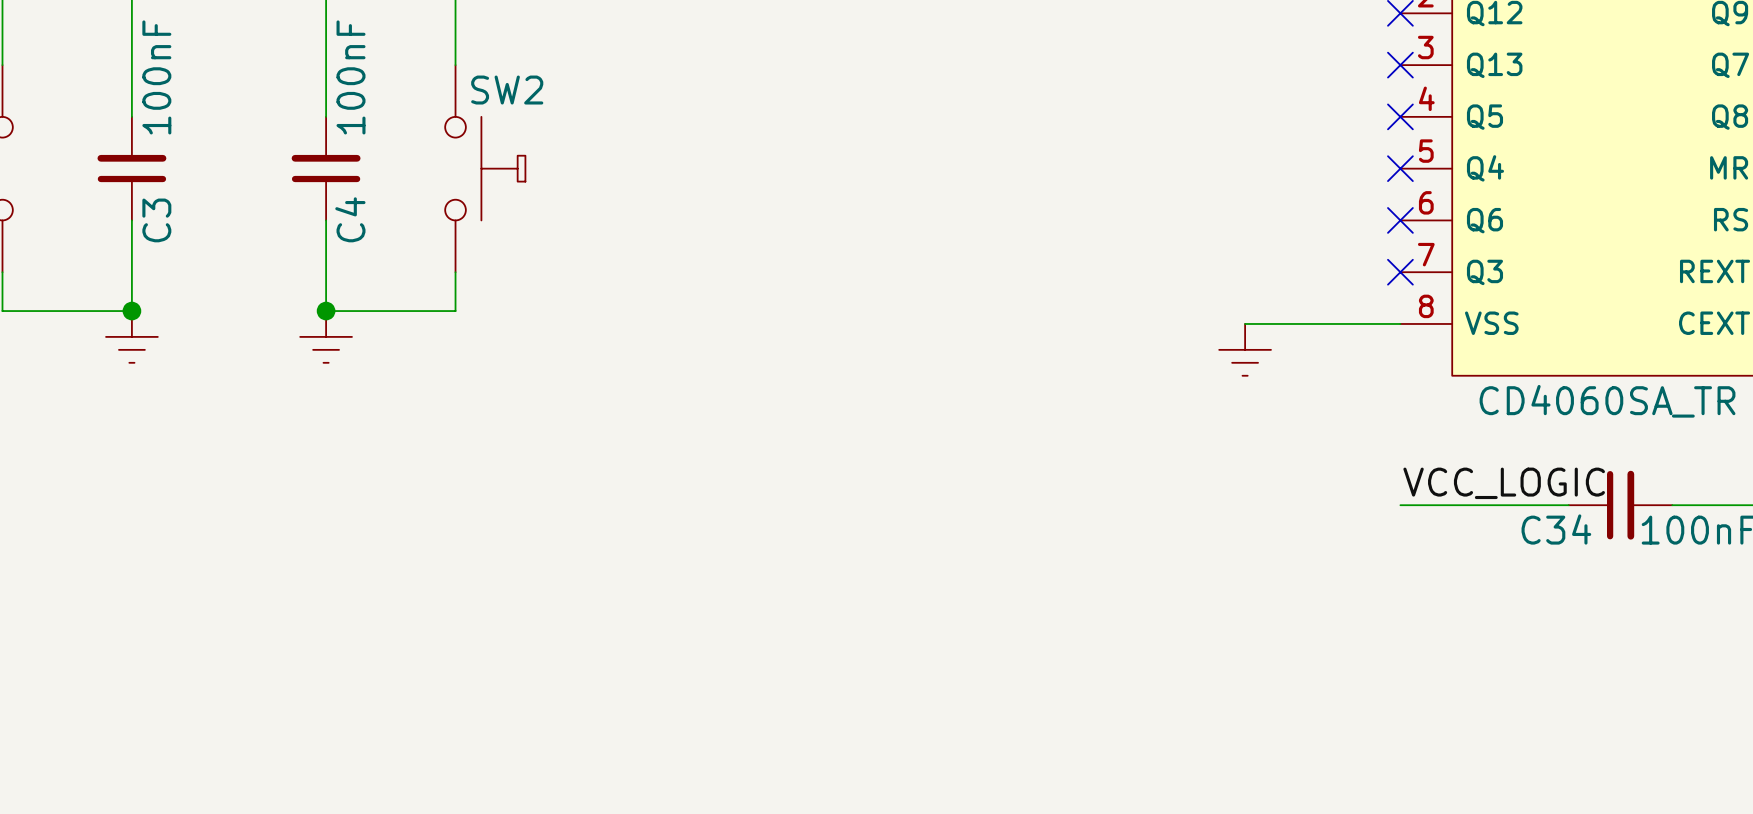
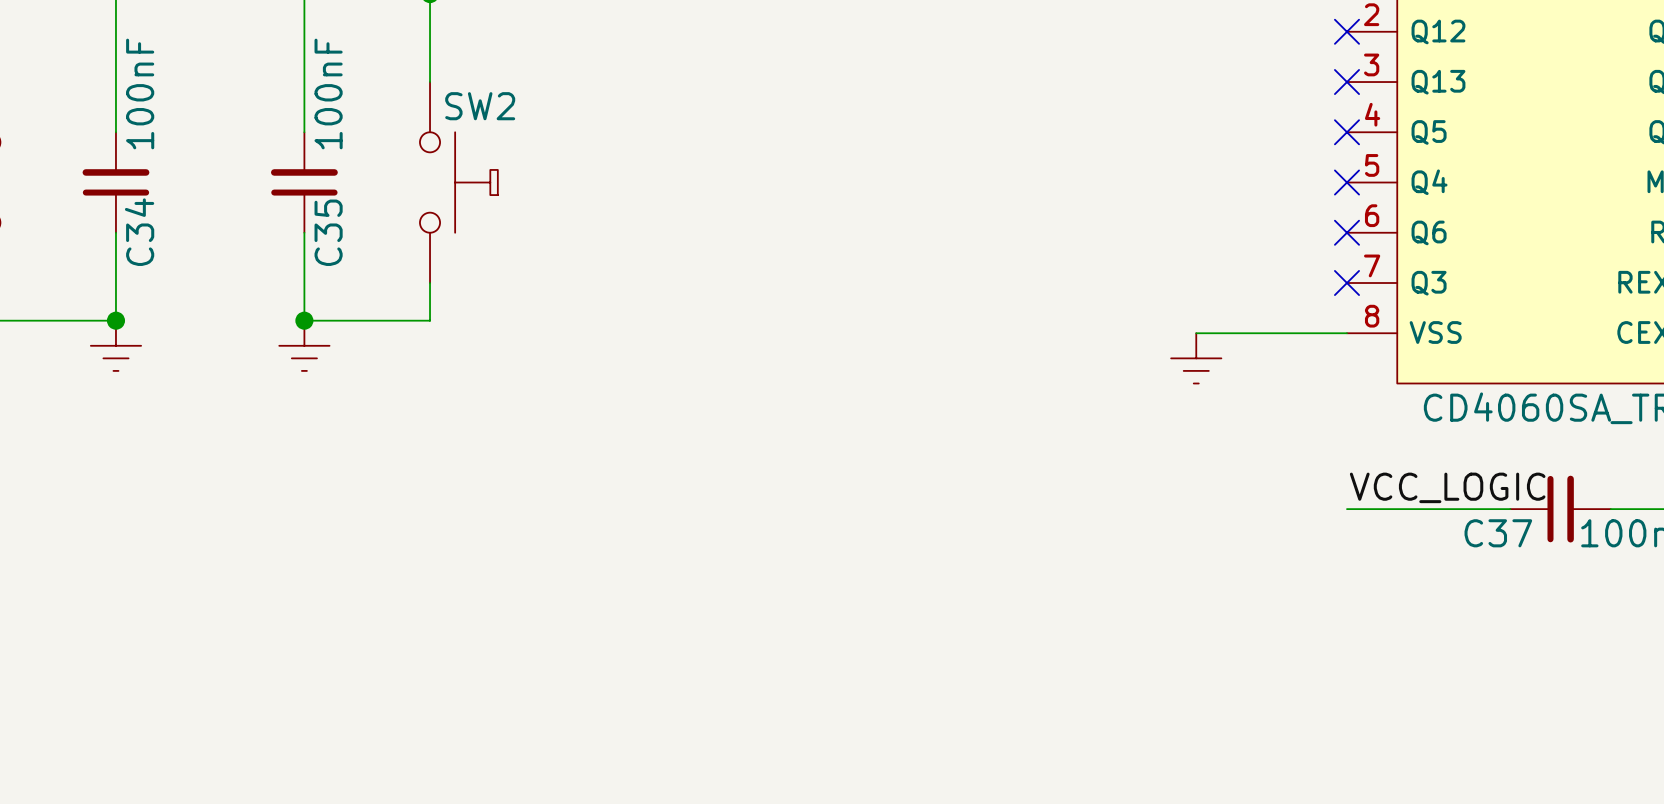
C4 name: C4 (350, 219) -> C35 (328, 232)
C3 name: C3 (156, 220) -> C34 (139, 232)
C34 name: C34 (1556, 529) -> C37 (1498, 533)

